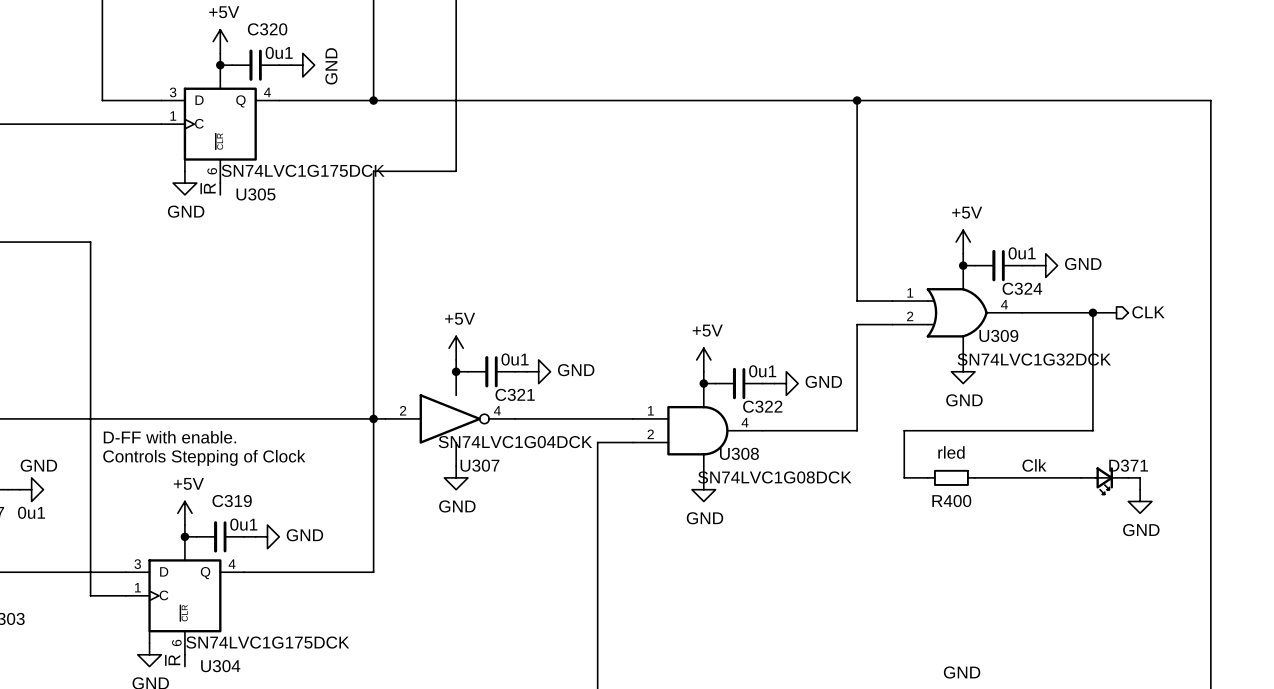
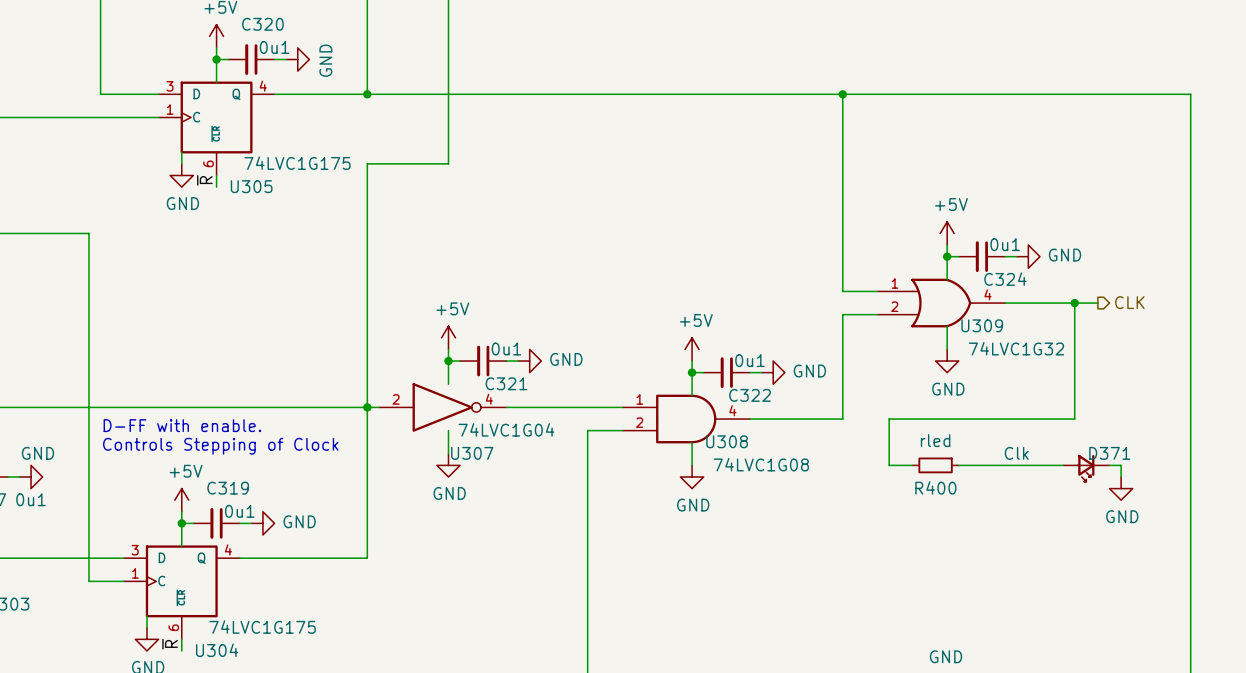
U305 value: SN74LVC1G175DCK (303, 170) -> 74LVC1G175 (297, 163)
U309 value: SN74LVC1G32DCK (1034, 359) -> 74LVC1G32 (1016, 348)
U307 value: SN74LVC1G04DCK (515, 442) -> 74LVC1G04 (506, 429)
U308 value: SN74LVC1G08DCK (774, 477) -> 74LVC1G08 (761, 464)
U304 value: SN74LVC1G175DCK (267, 642) -> 74LVC1G175 (262, 627)

